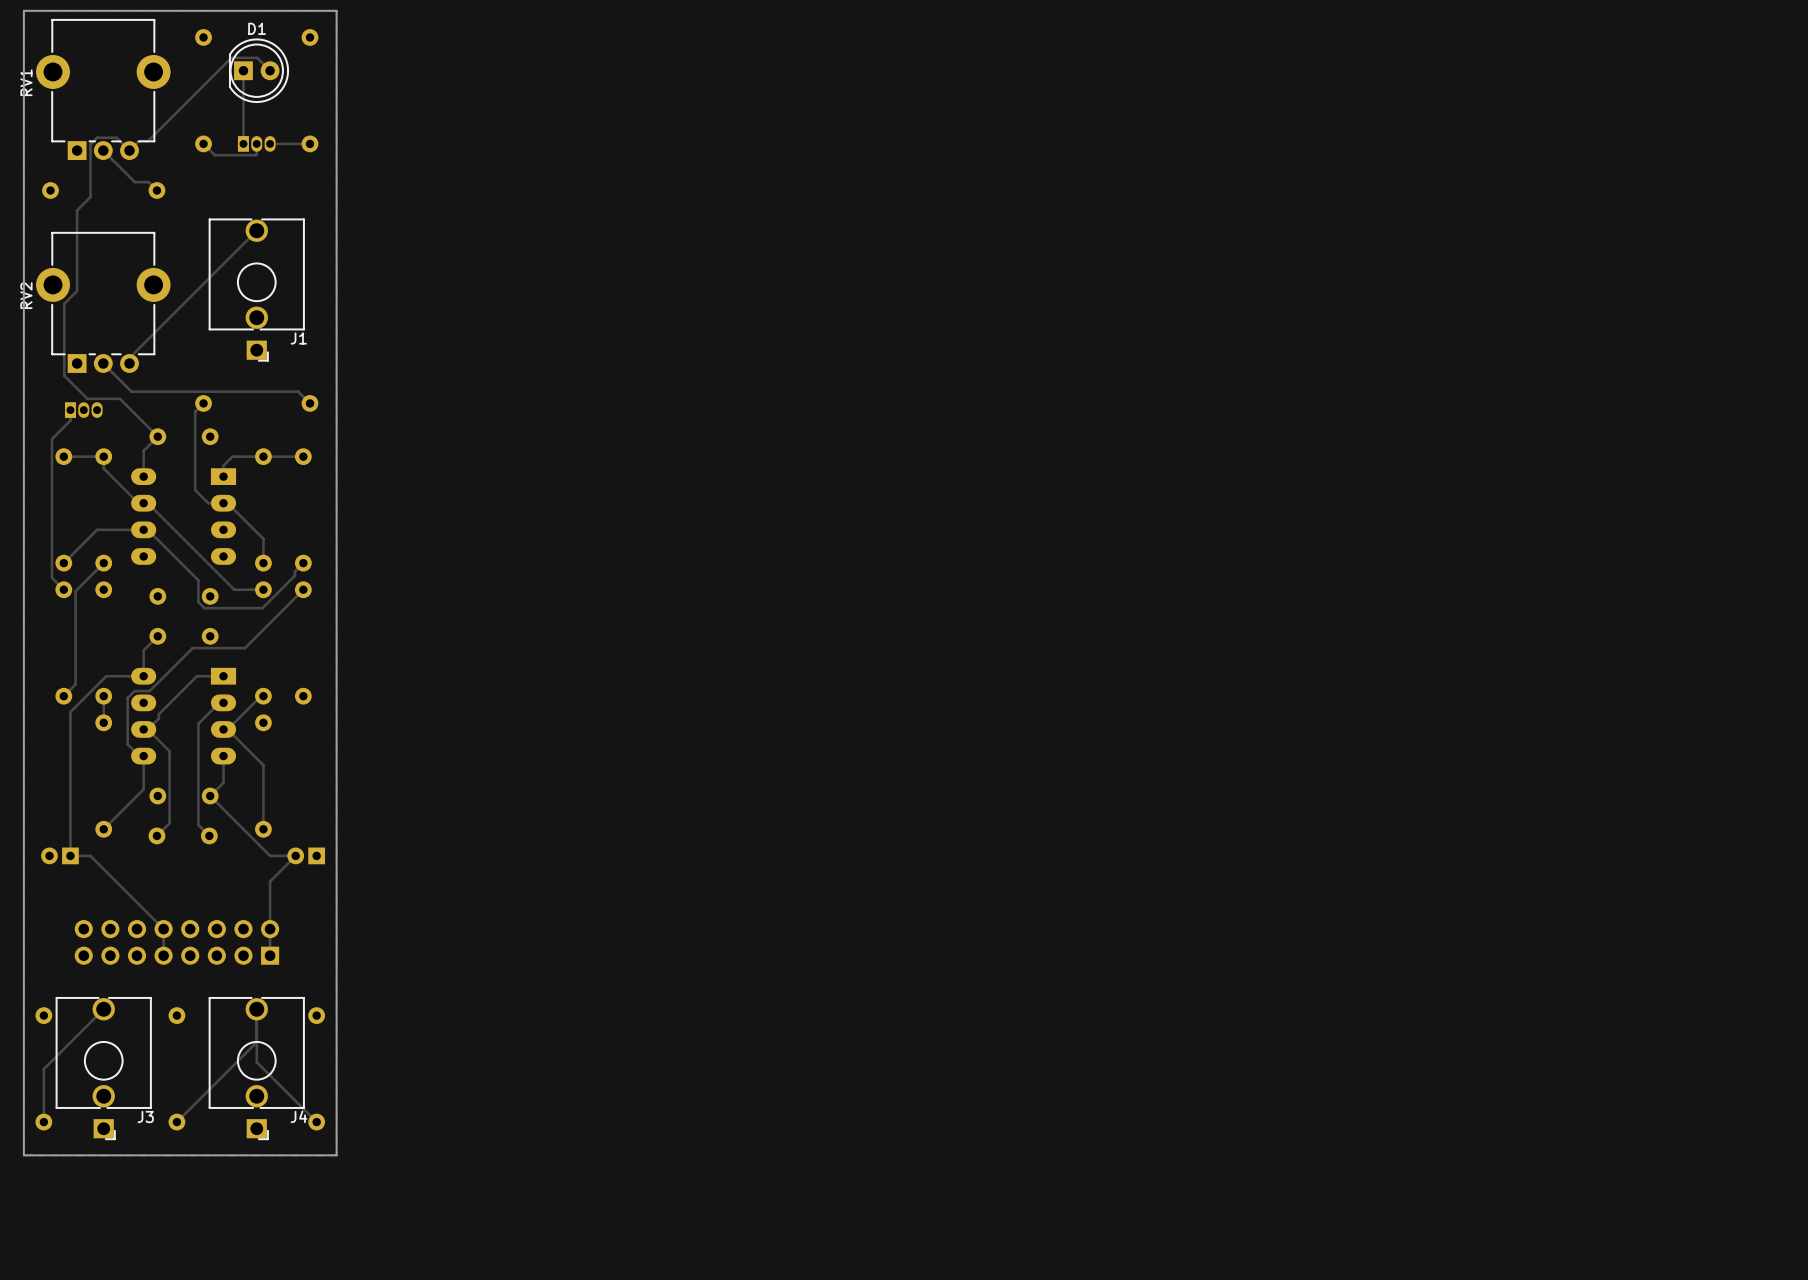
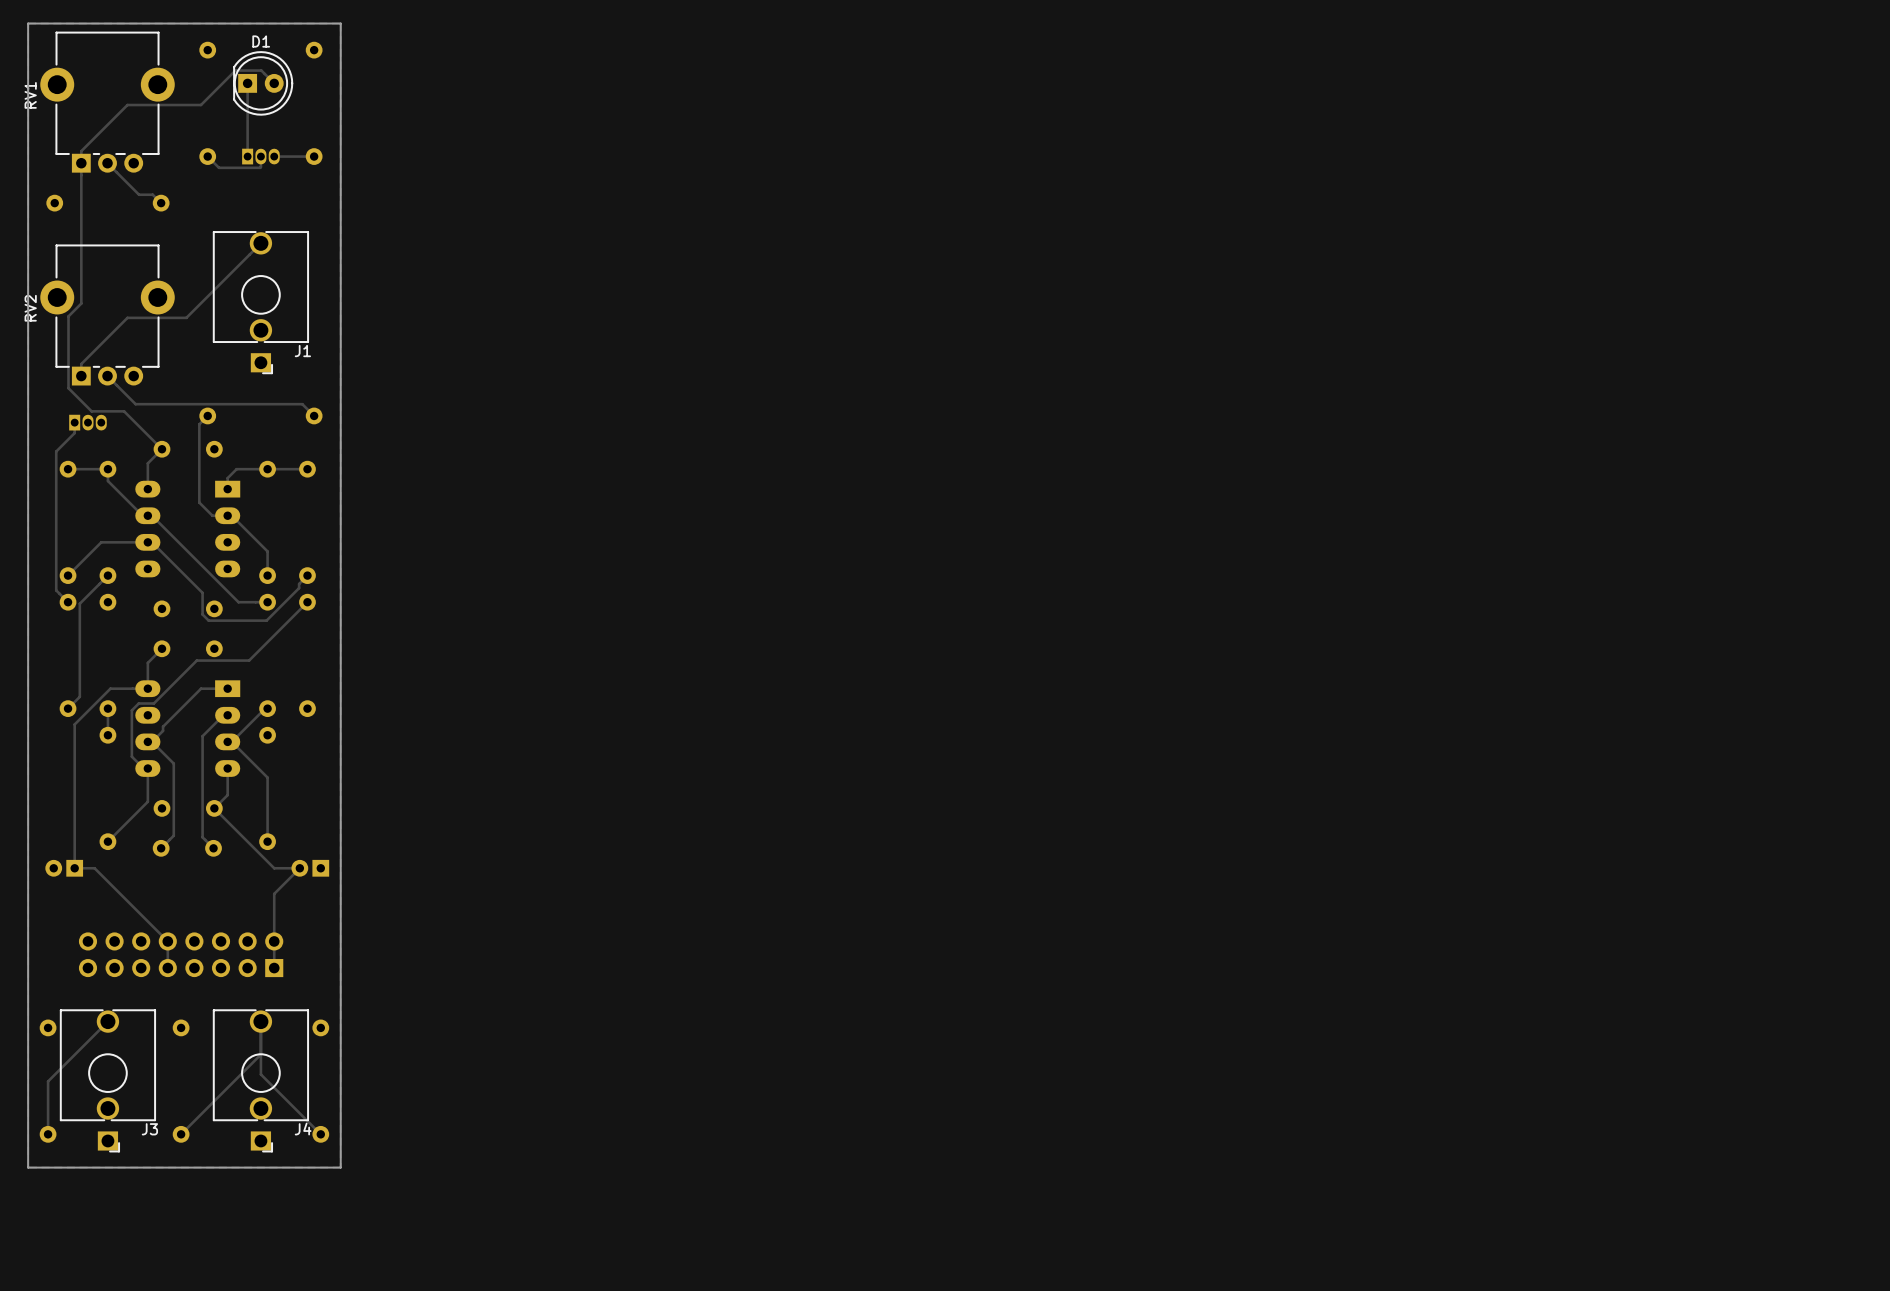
track: (196, 92) (148, 141) (138, 141) (129, 150) (116, 137) (97, 137) (90, 144) (90, 197) (77, 210) -> (201, 105) (127, 105) (81, 151) (81, 223)
track: (182, 305) (129, 358) (129, 363) -> (186, 317) (127, 317) (81, 364) (81, 376)

